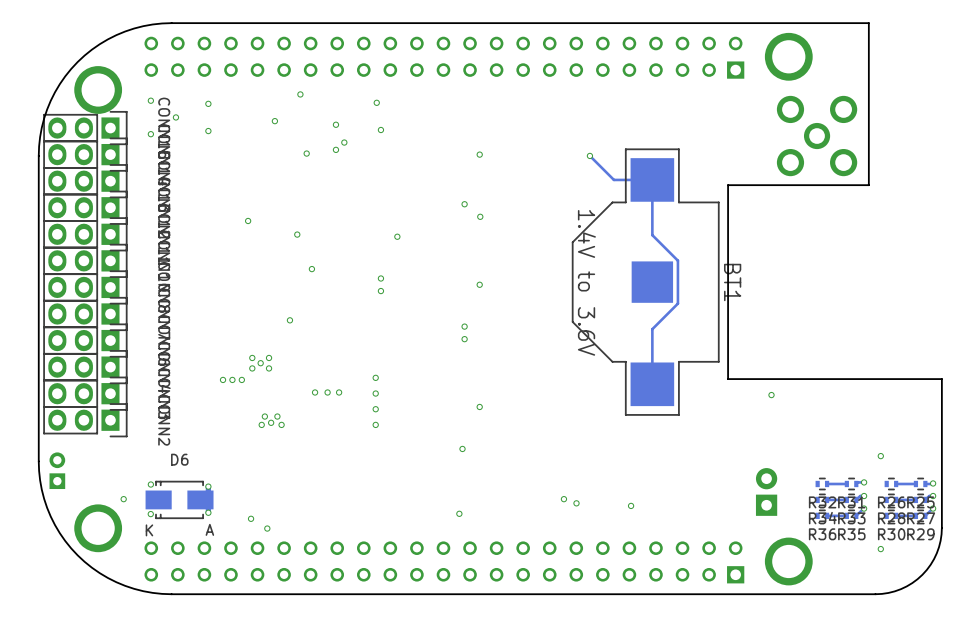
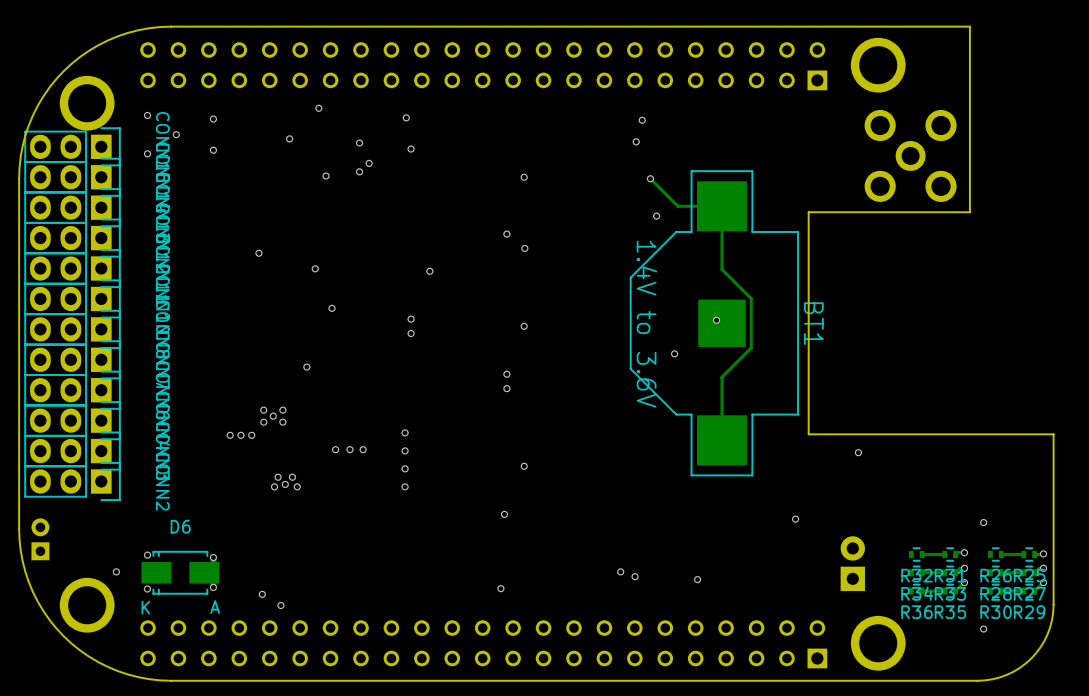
via: none -> (642, 120)
via: none -> (636, 141)
via: none -> (656, 216)
via: none -> (716, 320)
via: none -> (674, 353)
via: none -> (795, 519)

